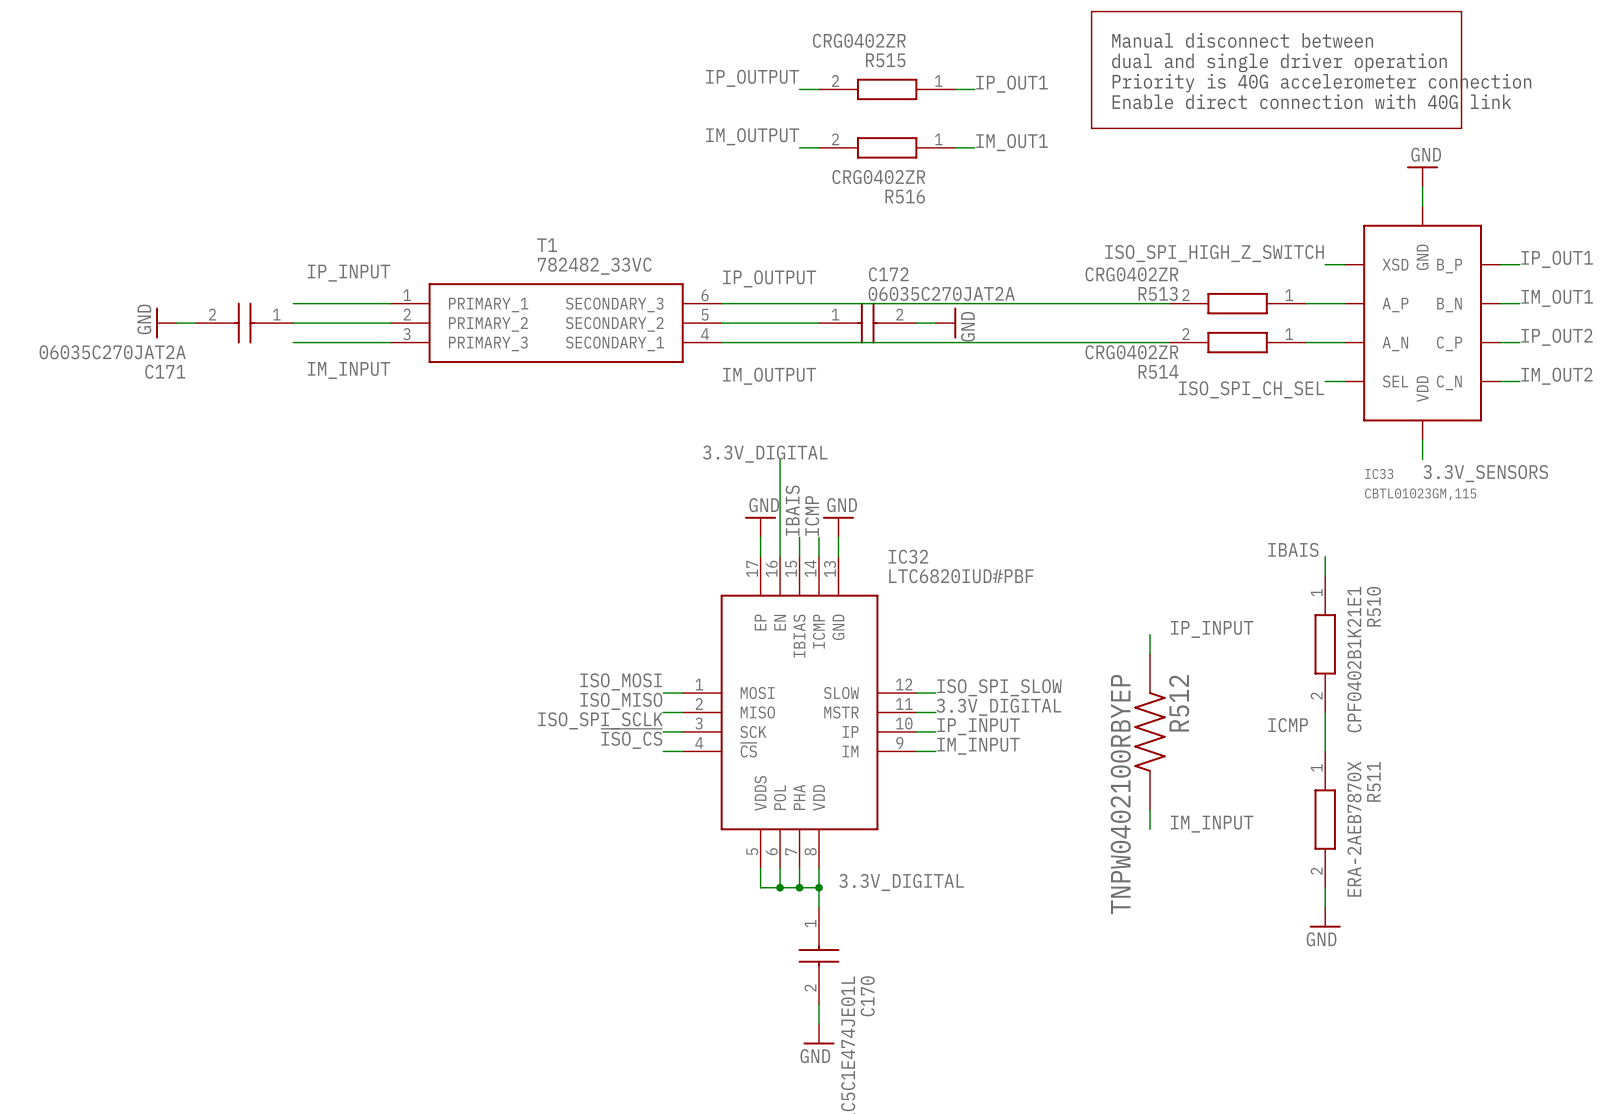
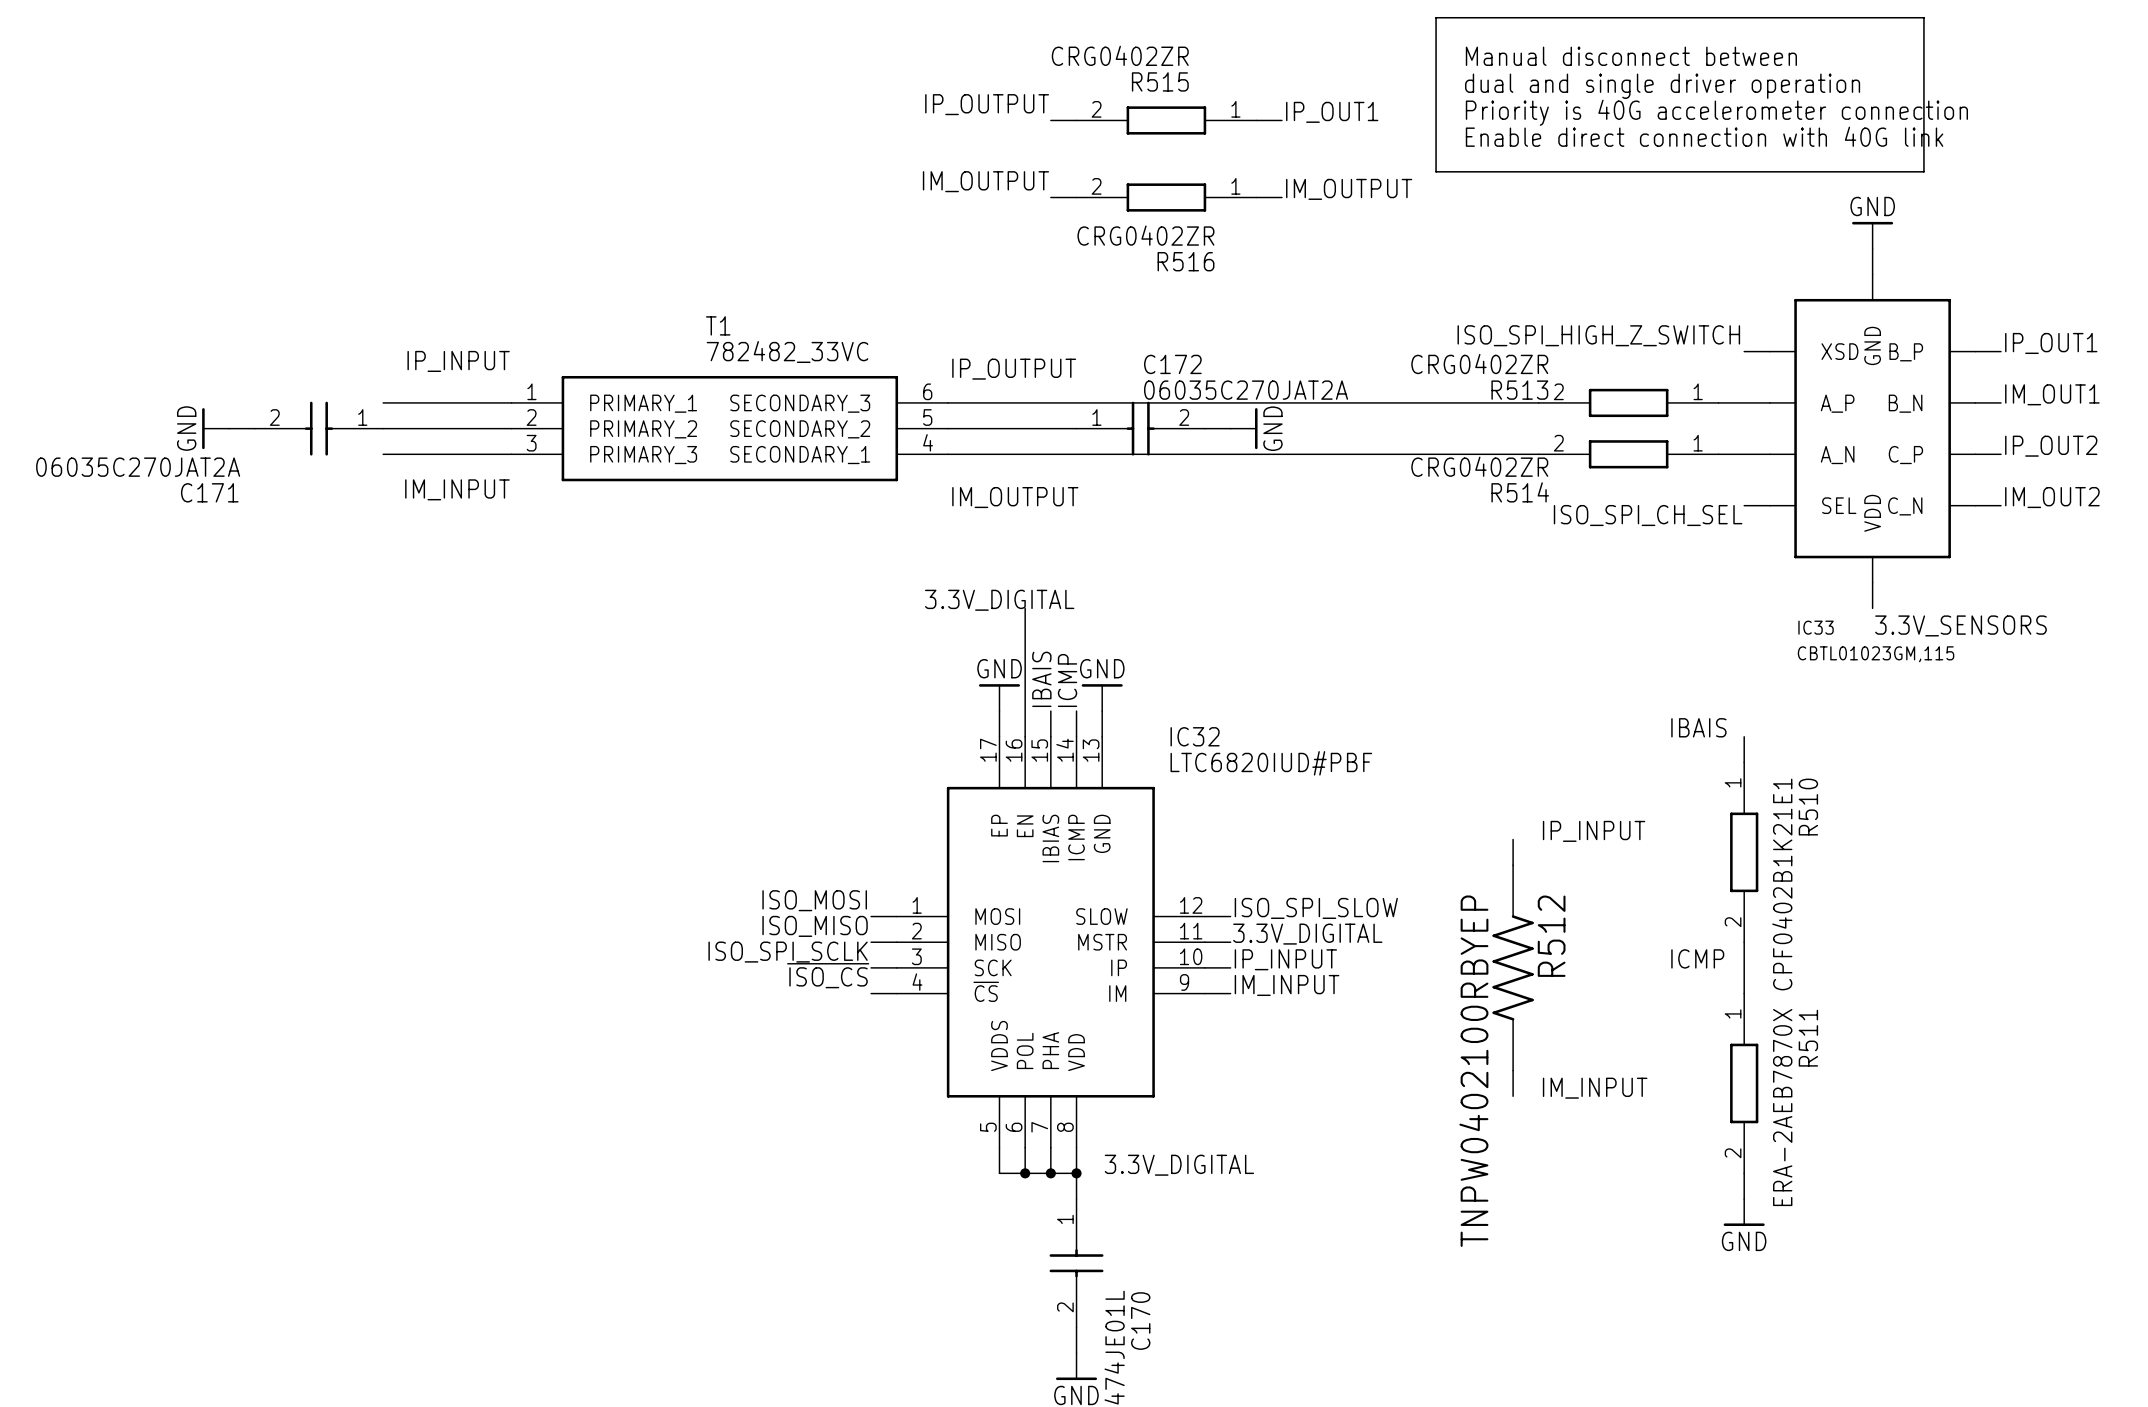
label: IM_OUT1 (1011, 142) -> IM_OUTPUT (1349, 189)

